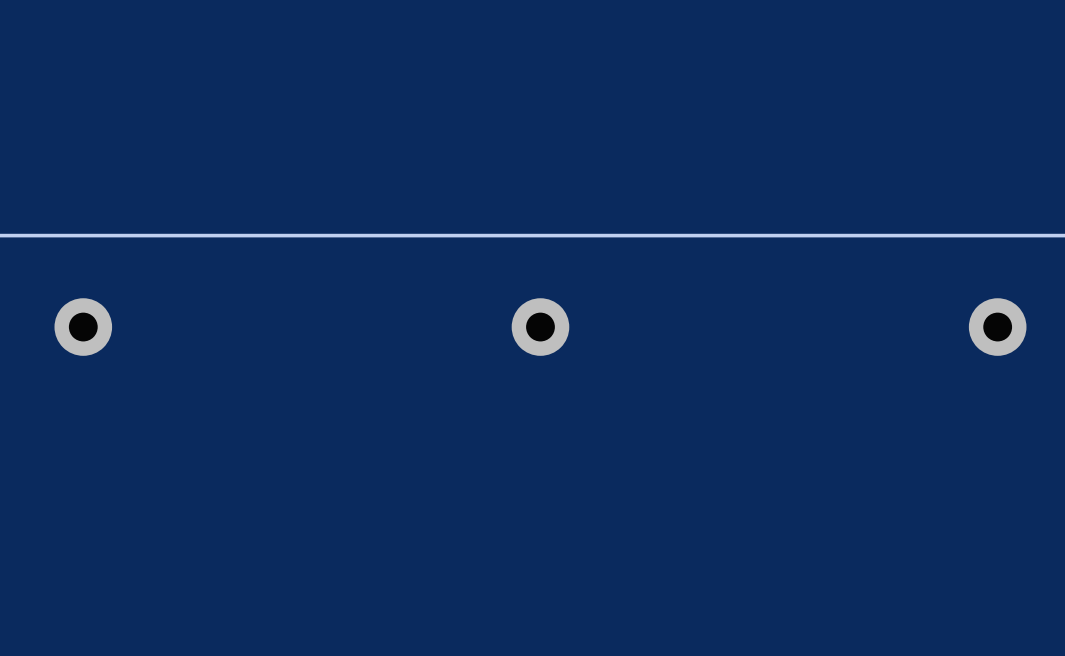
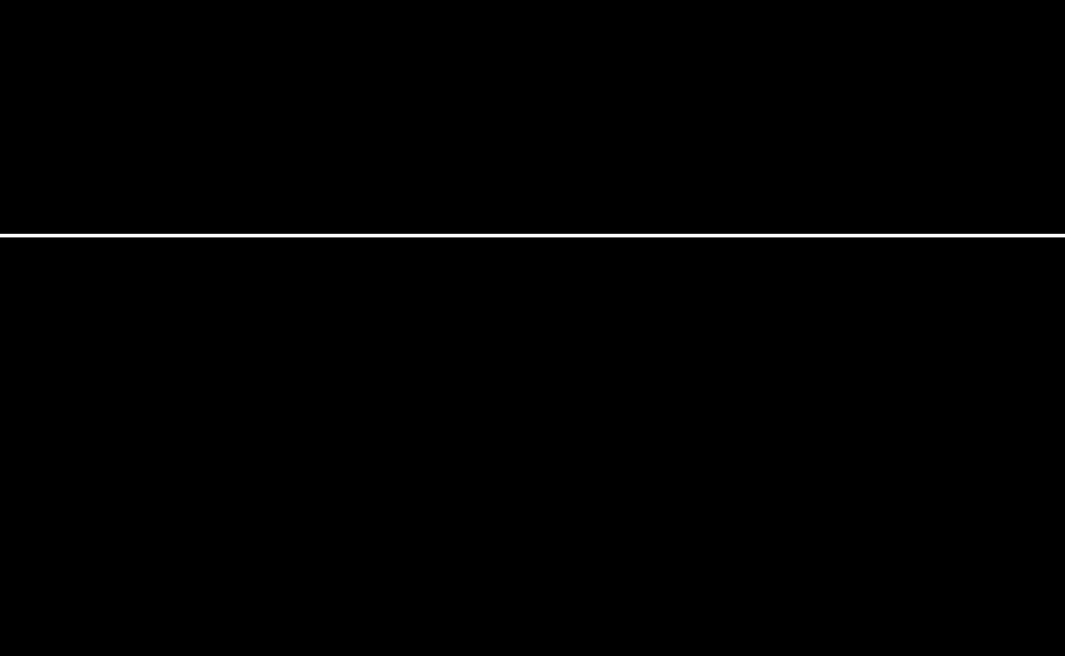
via: (83, 327) -> none
via: (540, 327) -> none
via: (997, 327) -> none

